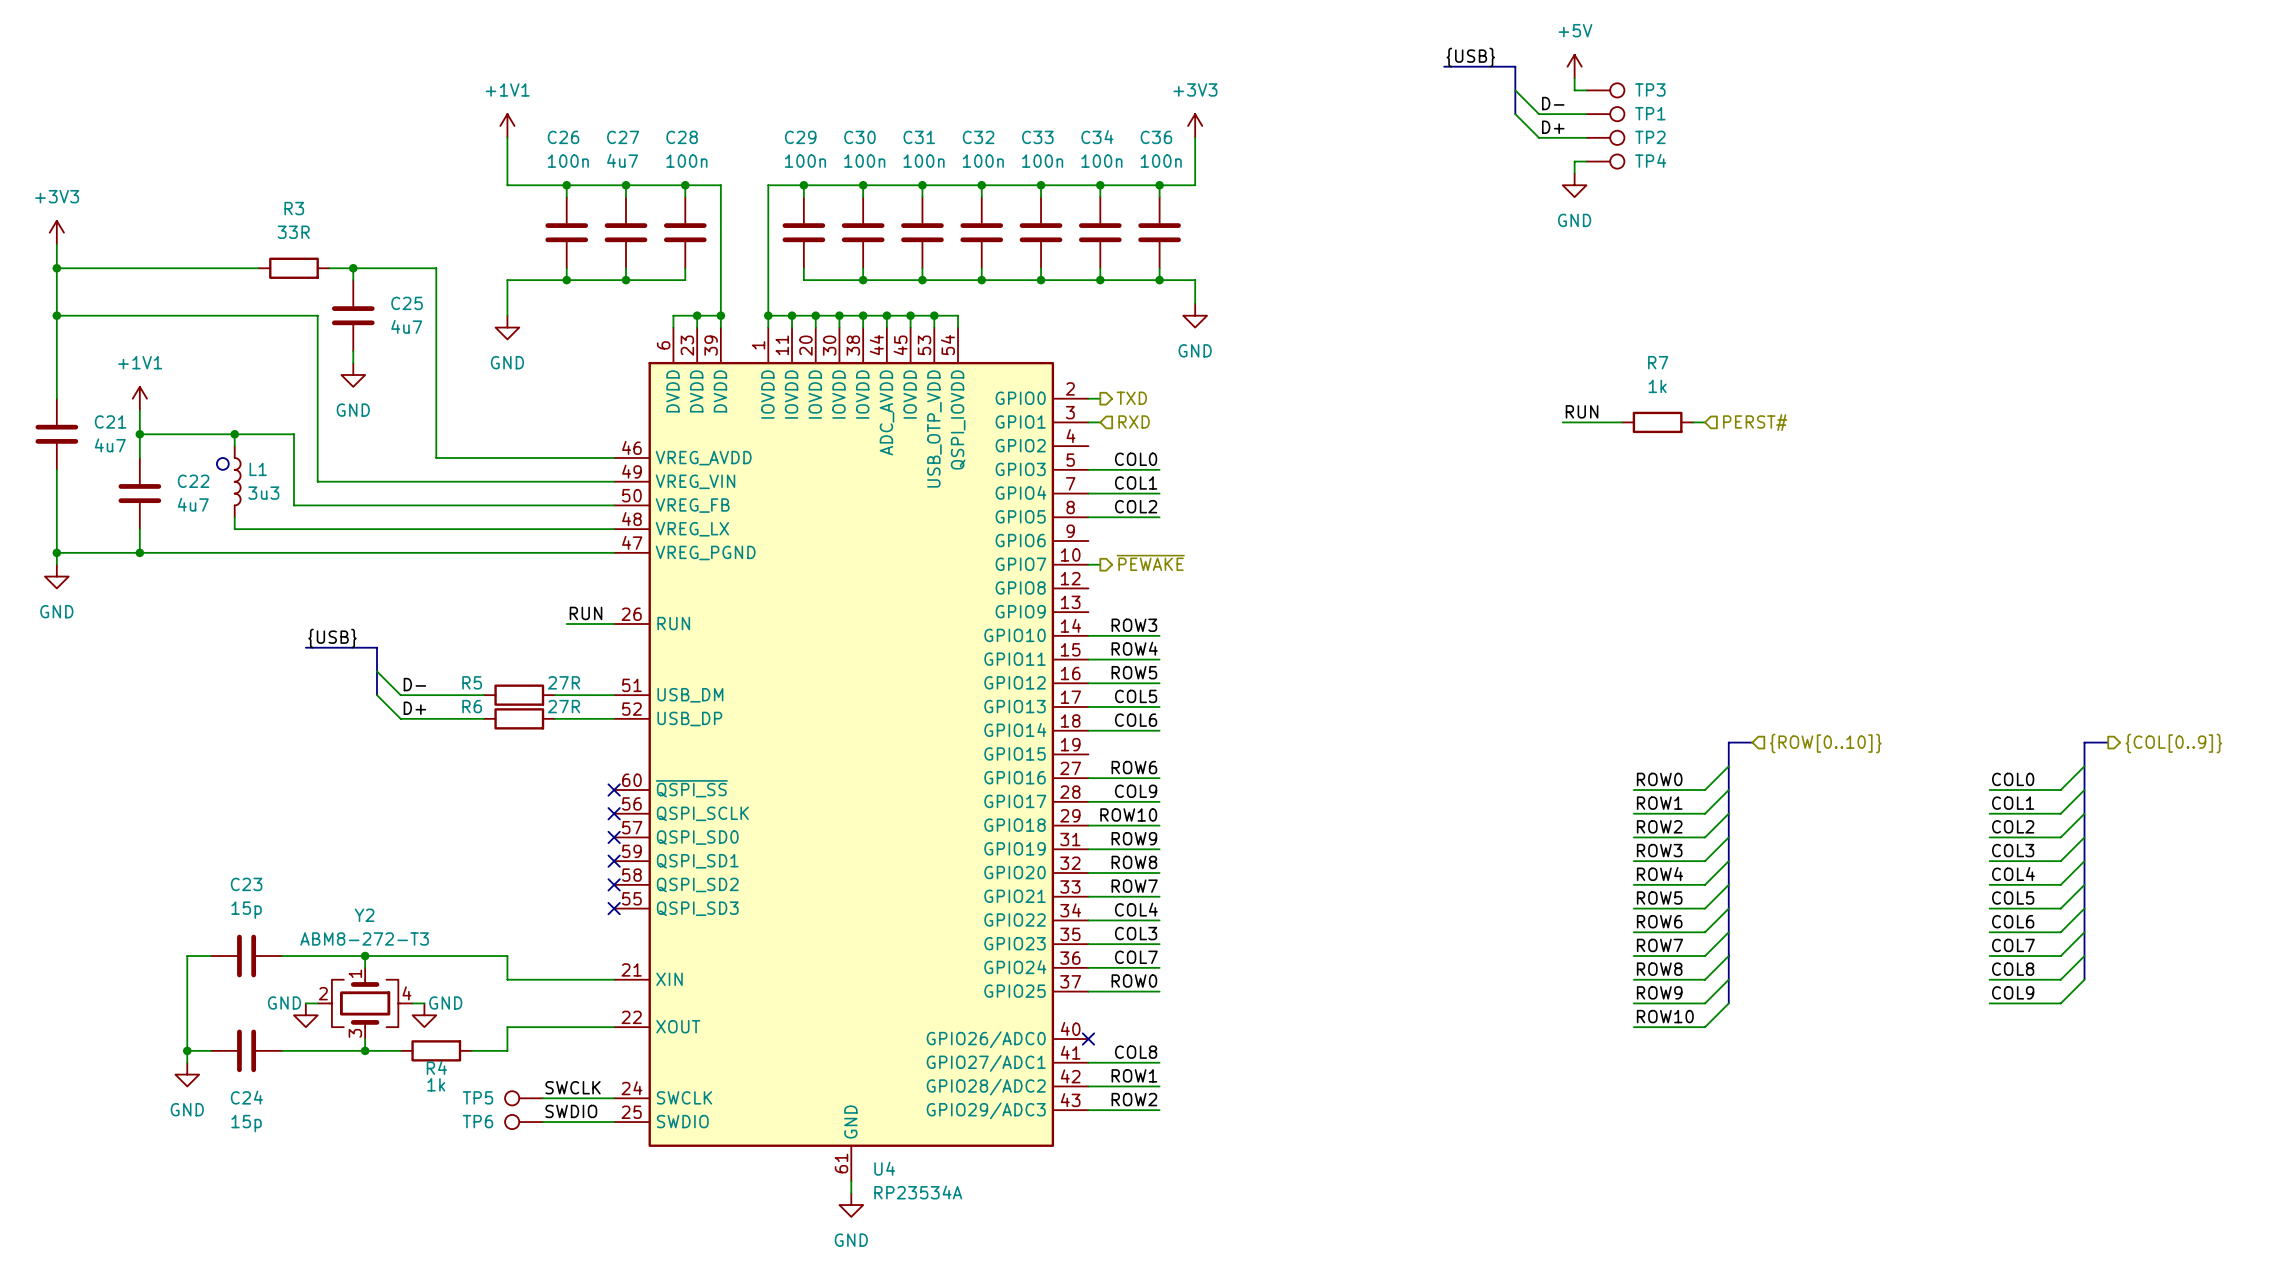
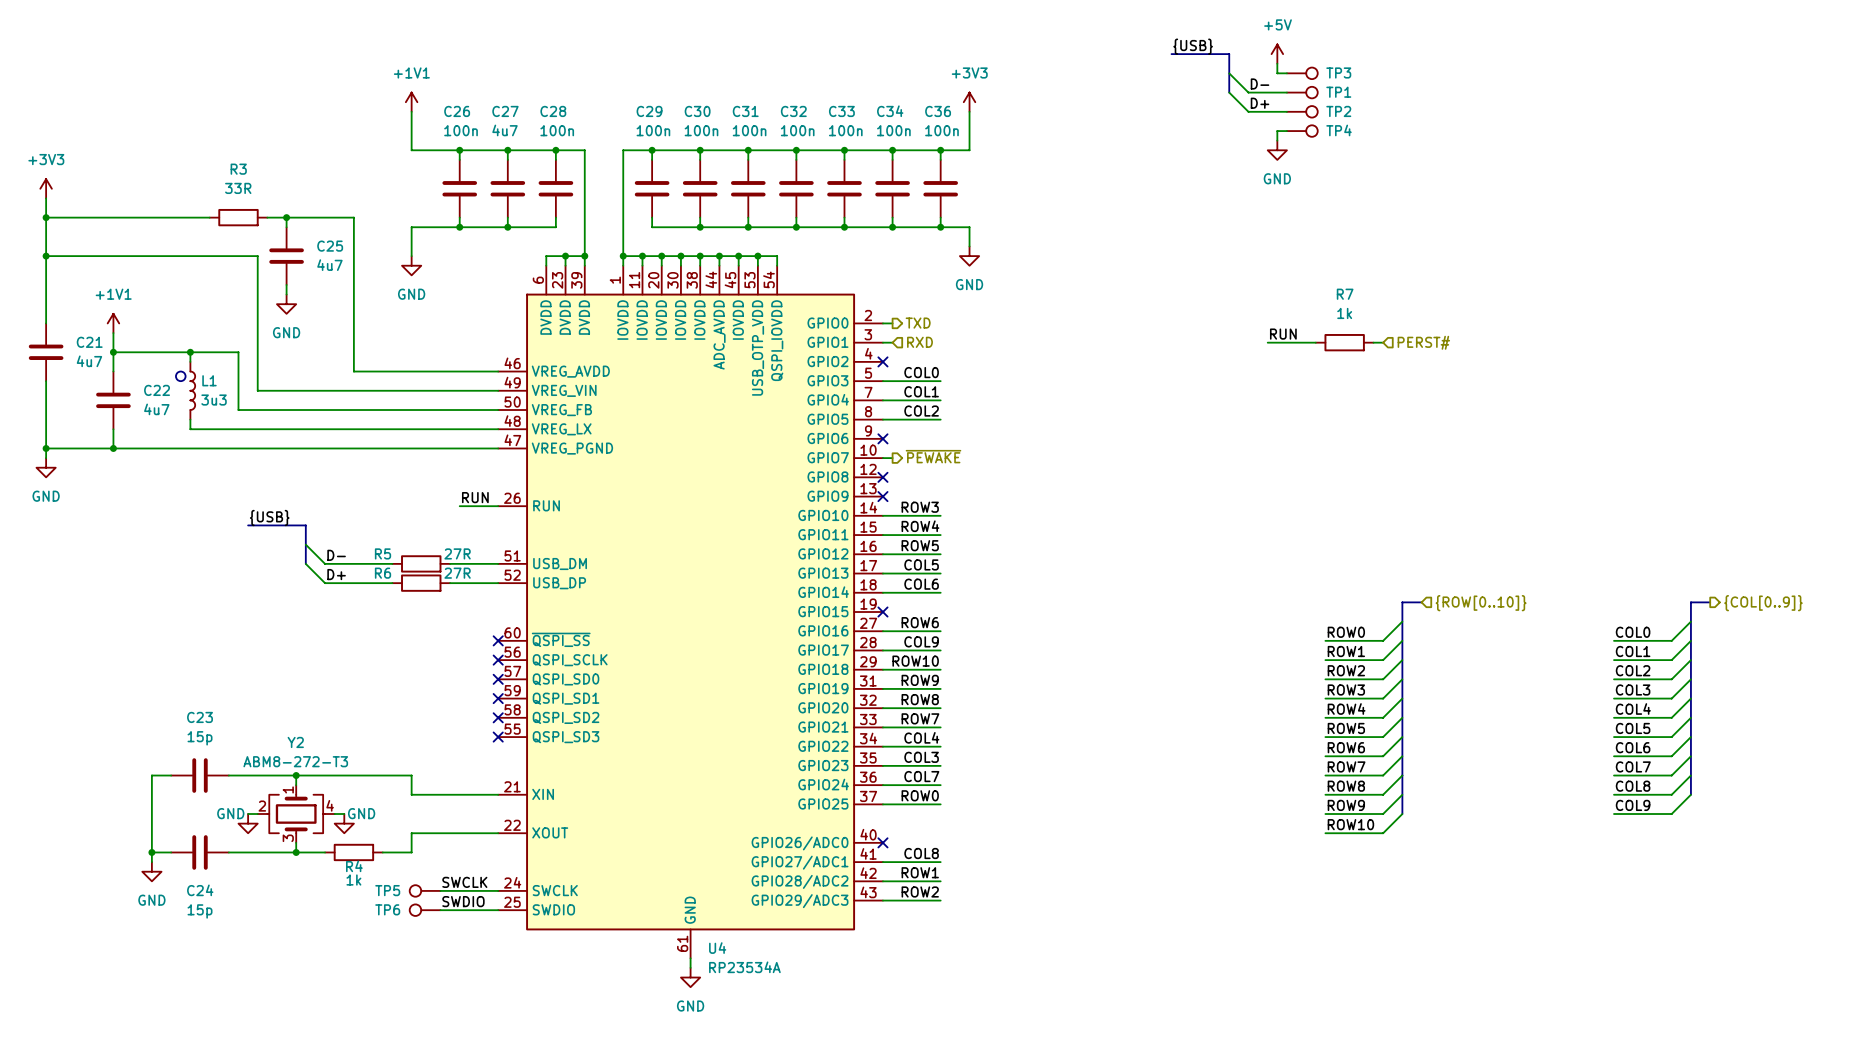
no-connect mark: none -> (882, 361)
no-connect mark: none -> (882, 438)
no-connect mark: none -> (882, 477)
no-connect mark: none -> (882, 496)
no-connect mark: none -> (882, 612)

